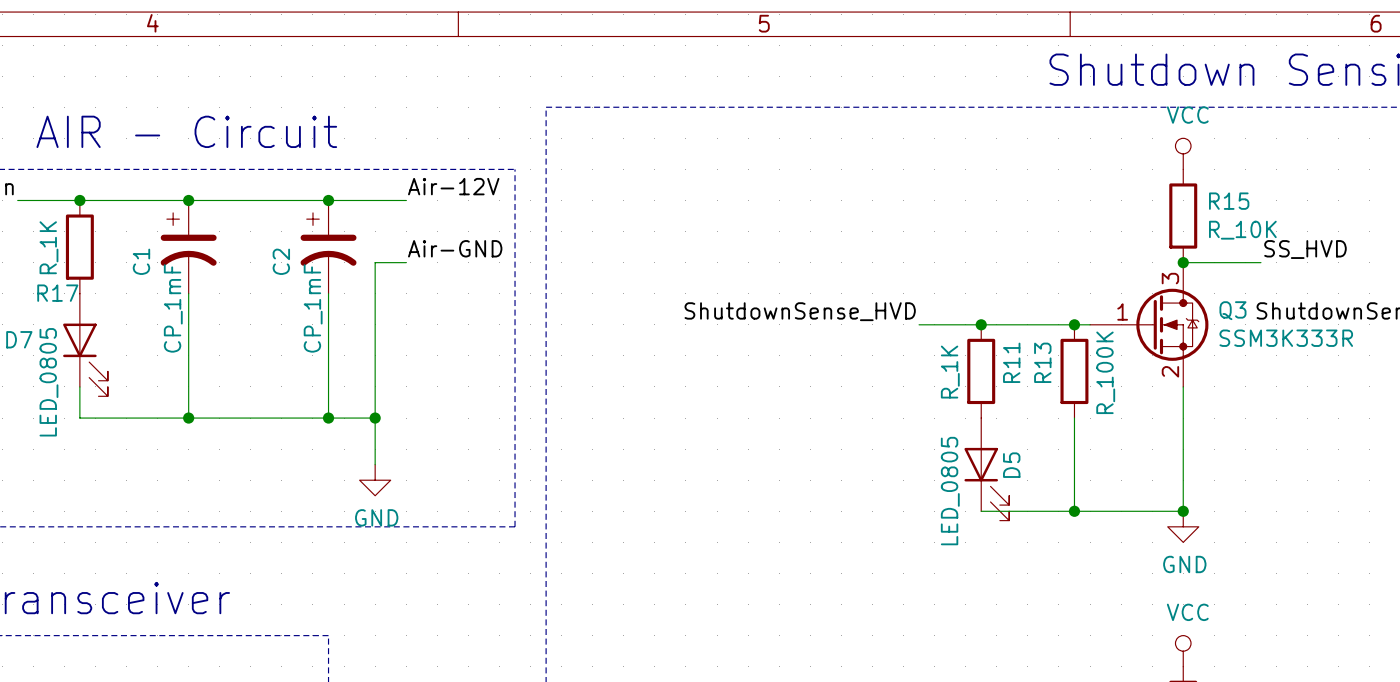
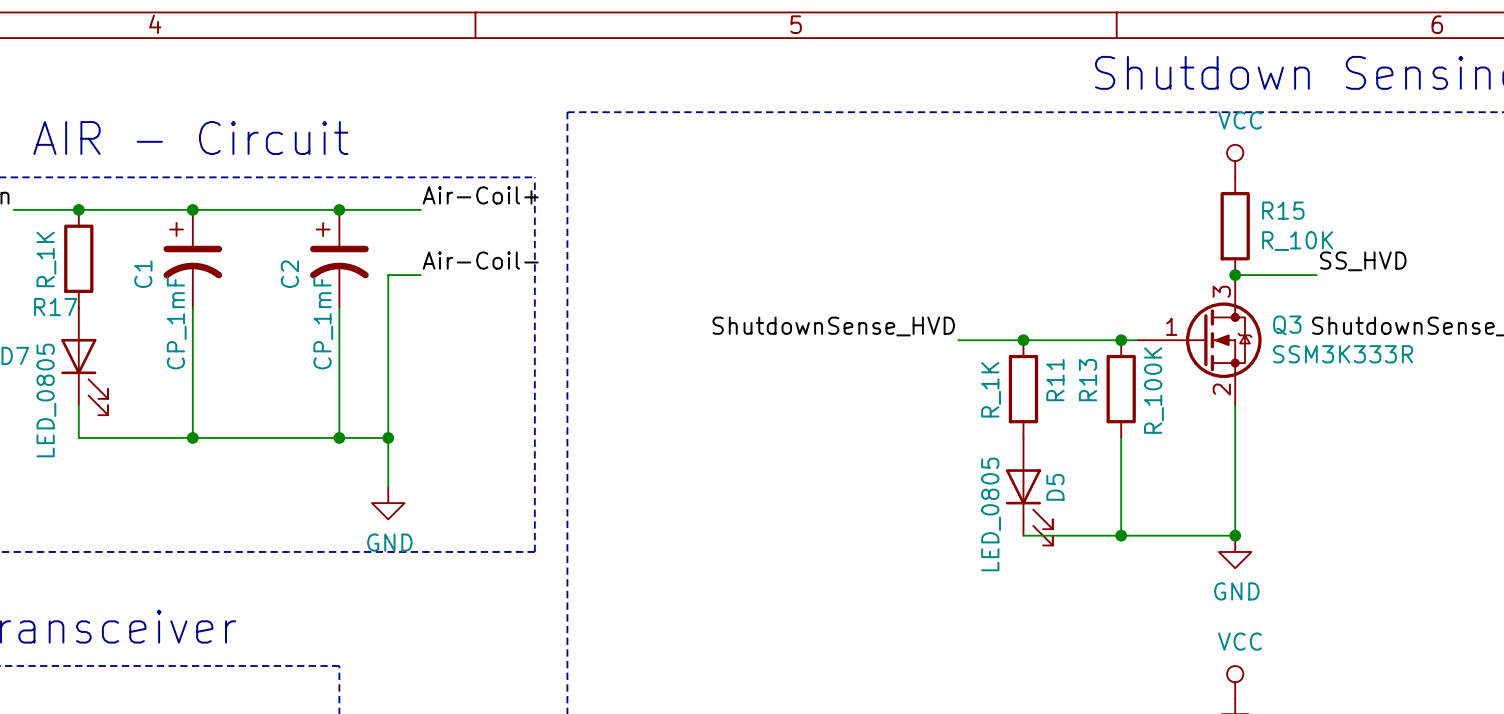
label: Air-12V (453, 186) -> Air-Coil+ (480, 195)
label: Air-GND (455, 248) -> Air-Coil- (480, 260)

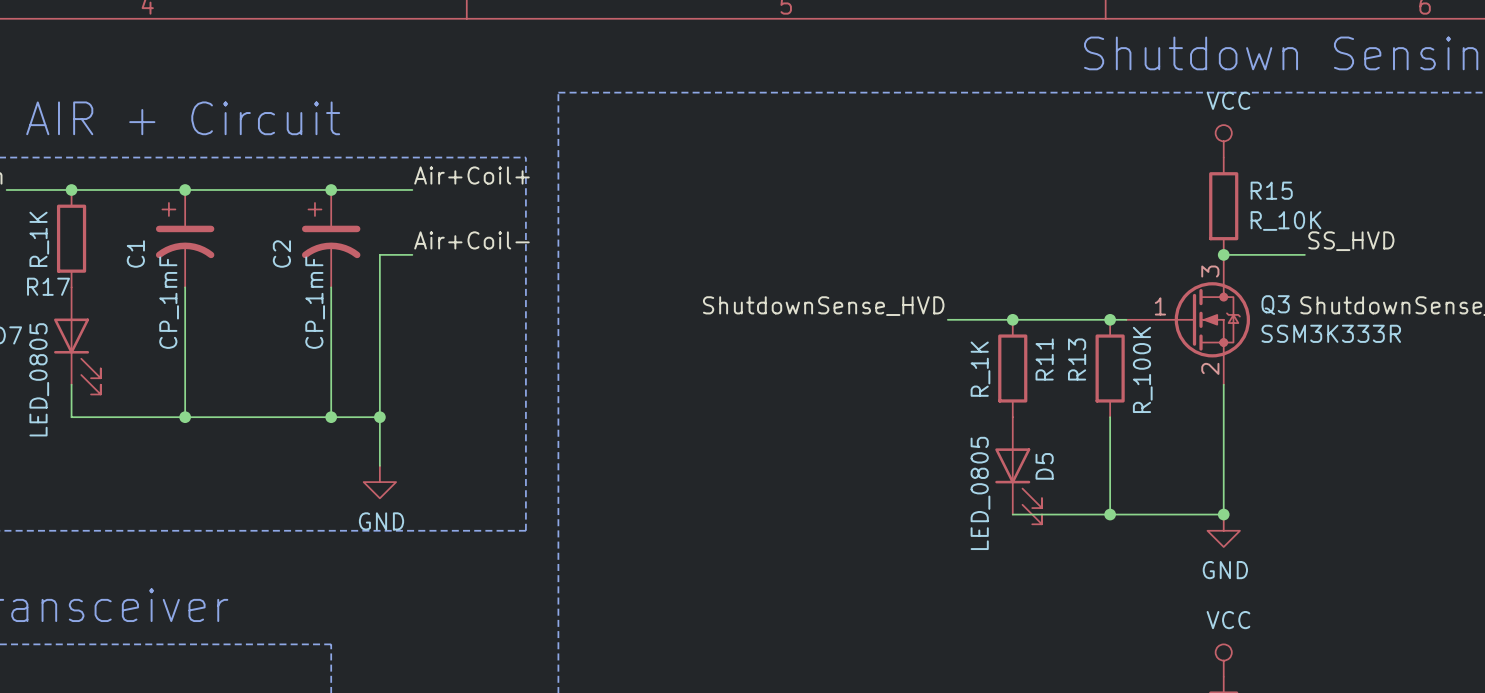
text: AIR - Circuit (190, 138) -> AIR + Circuit (183, 118)
label: Air-Coil+ (480, 195) -> Air+Coil+ (471, 175)
label: Air-Coil- (480, 260) -> Air+Coil- (471, 240)

